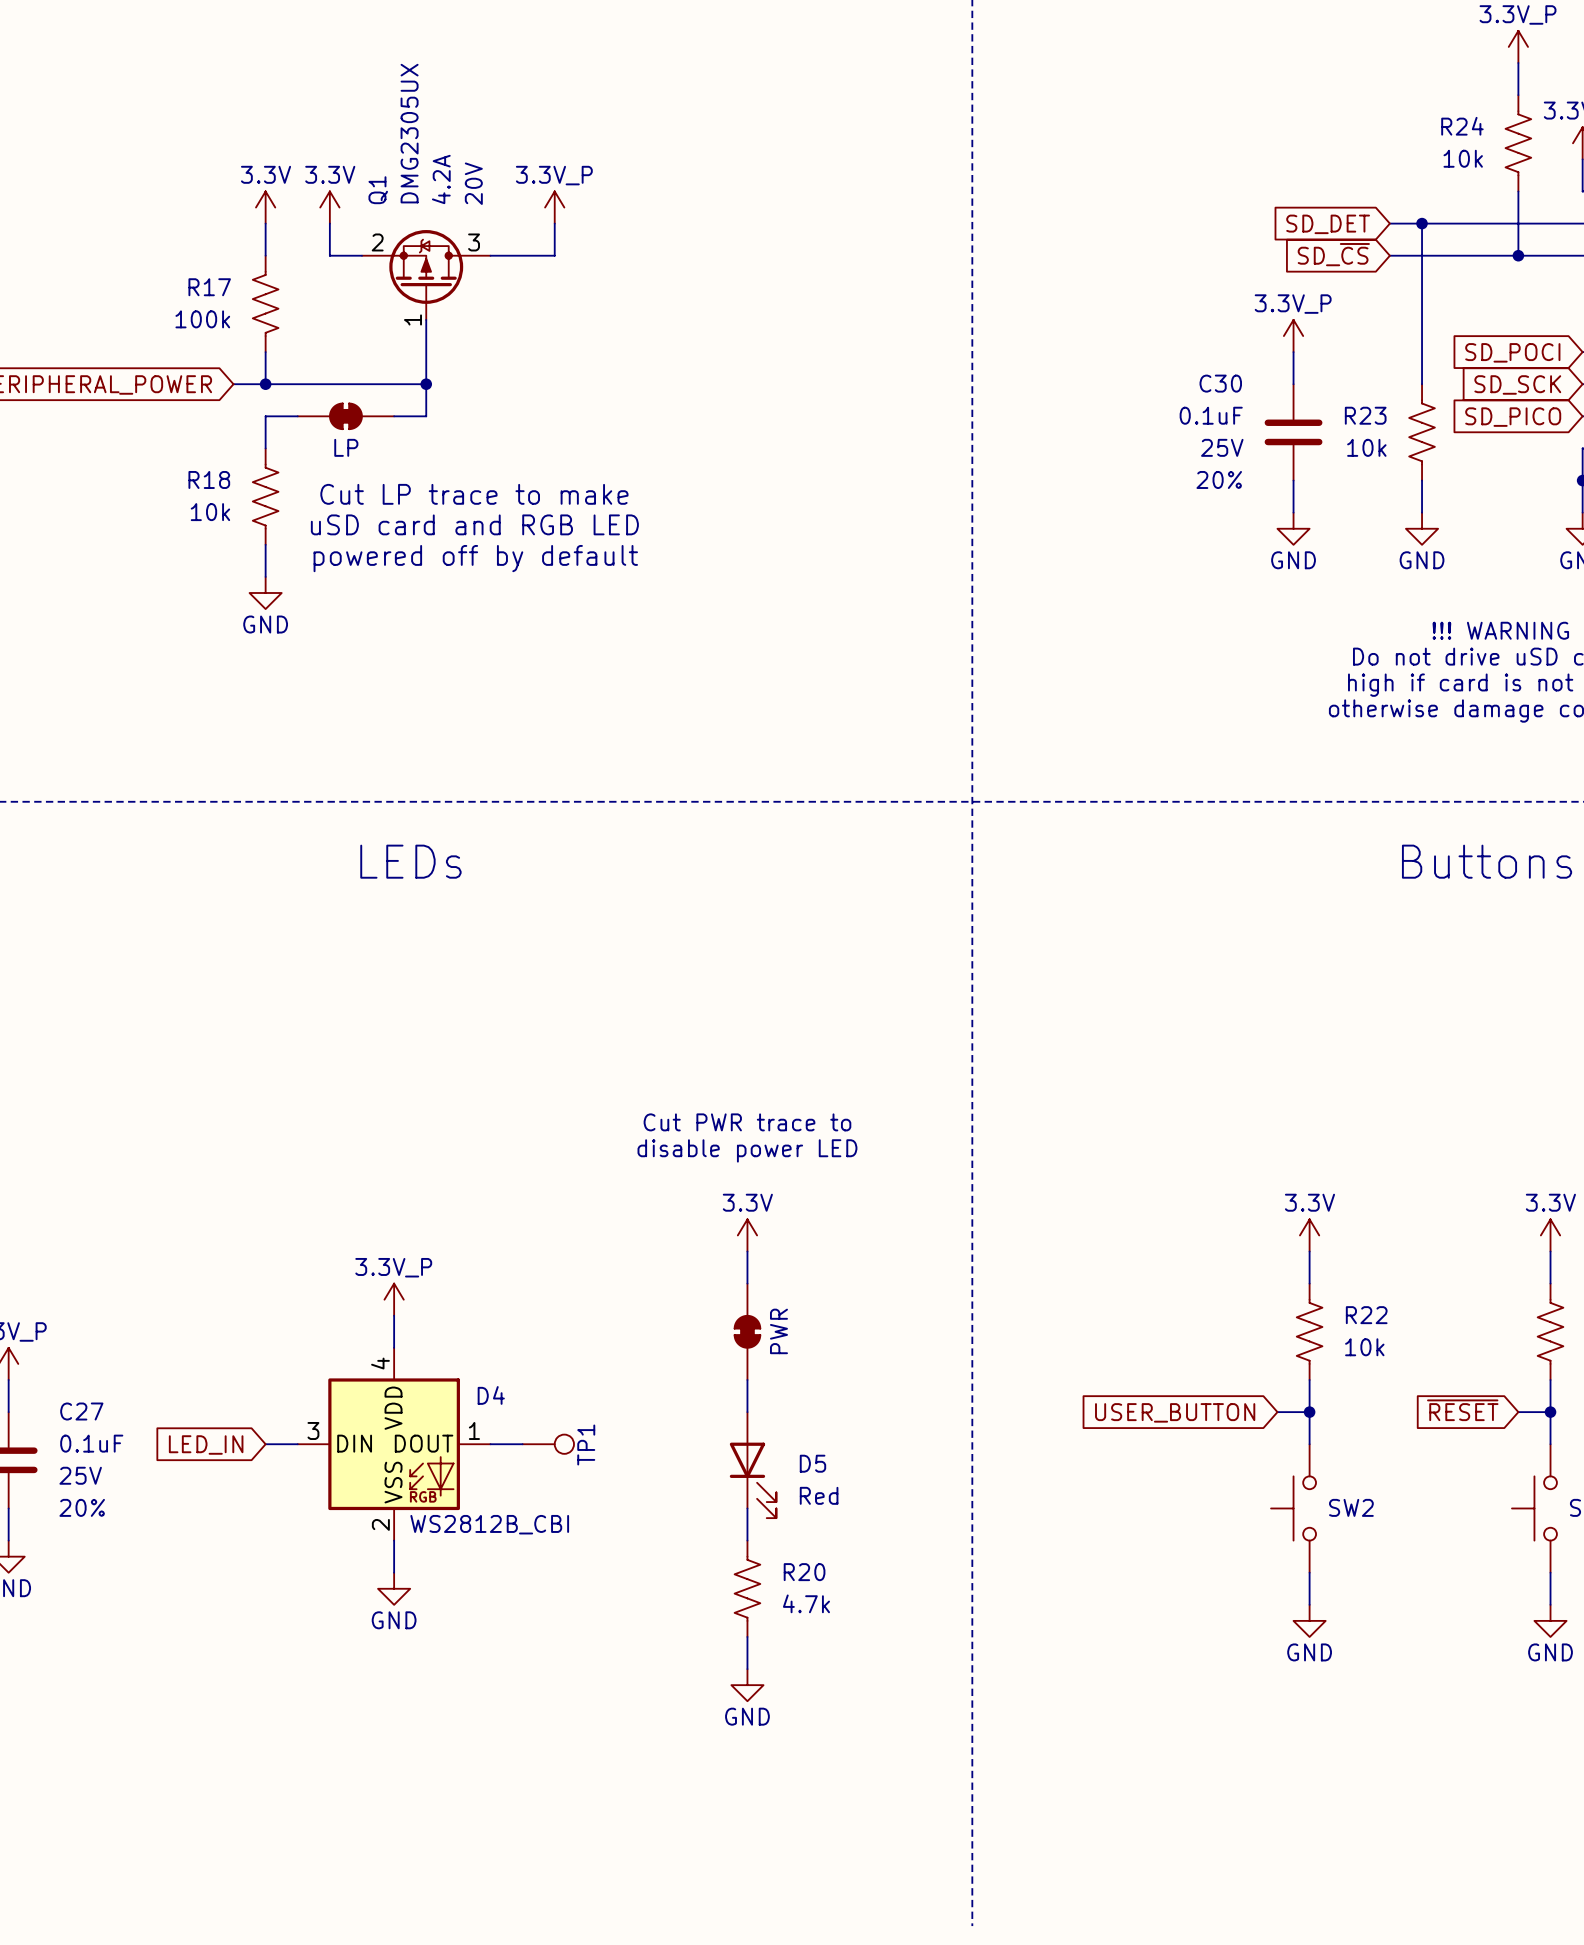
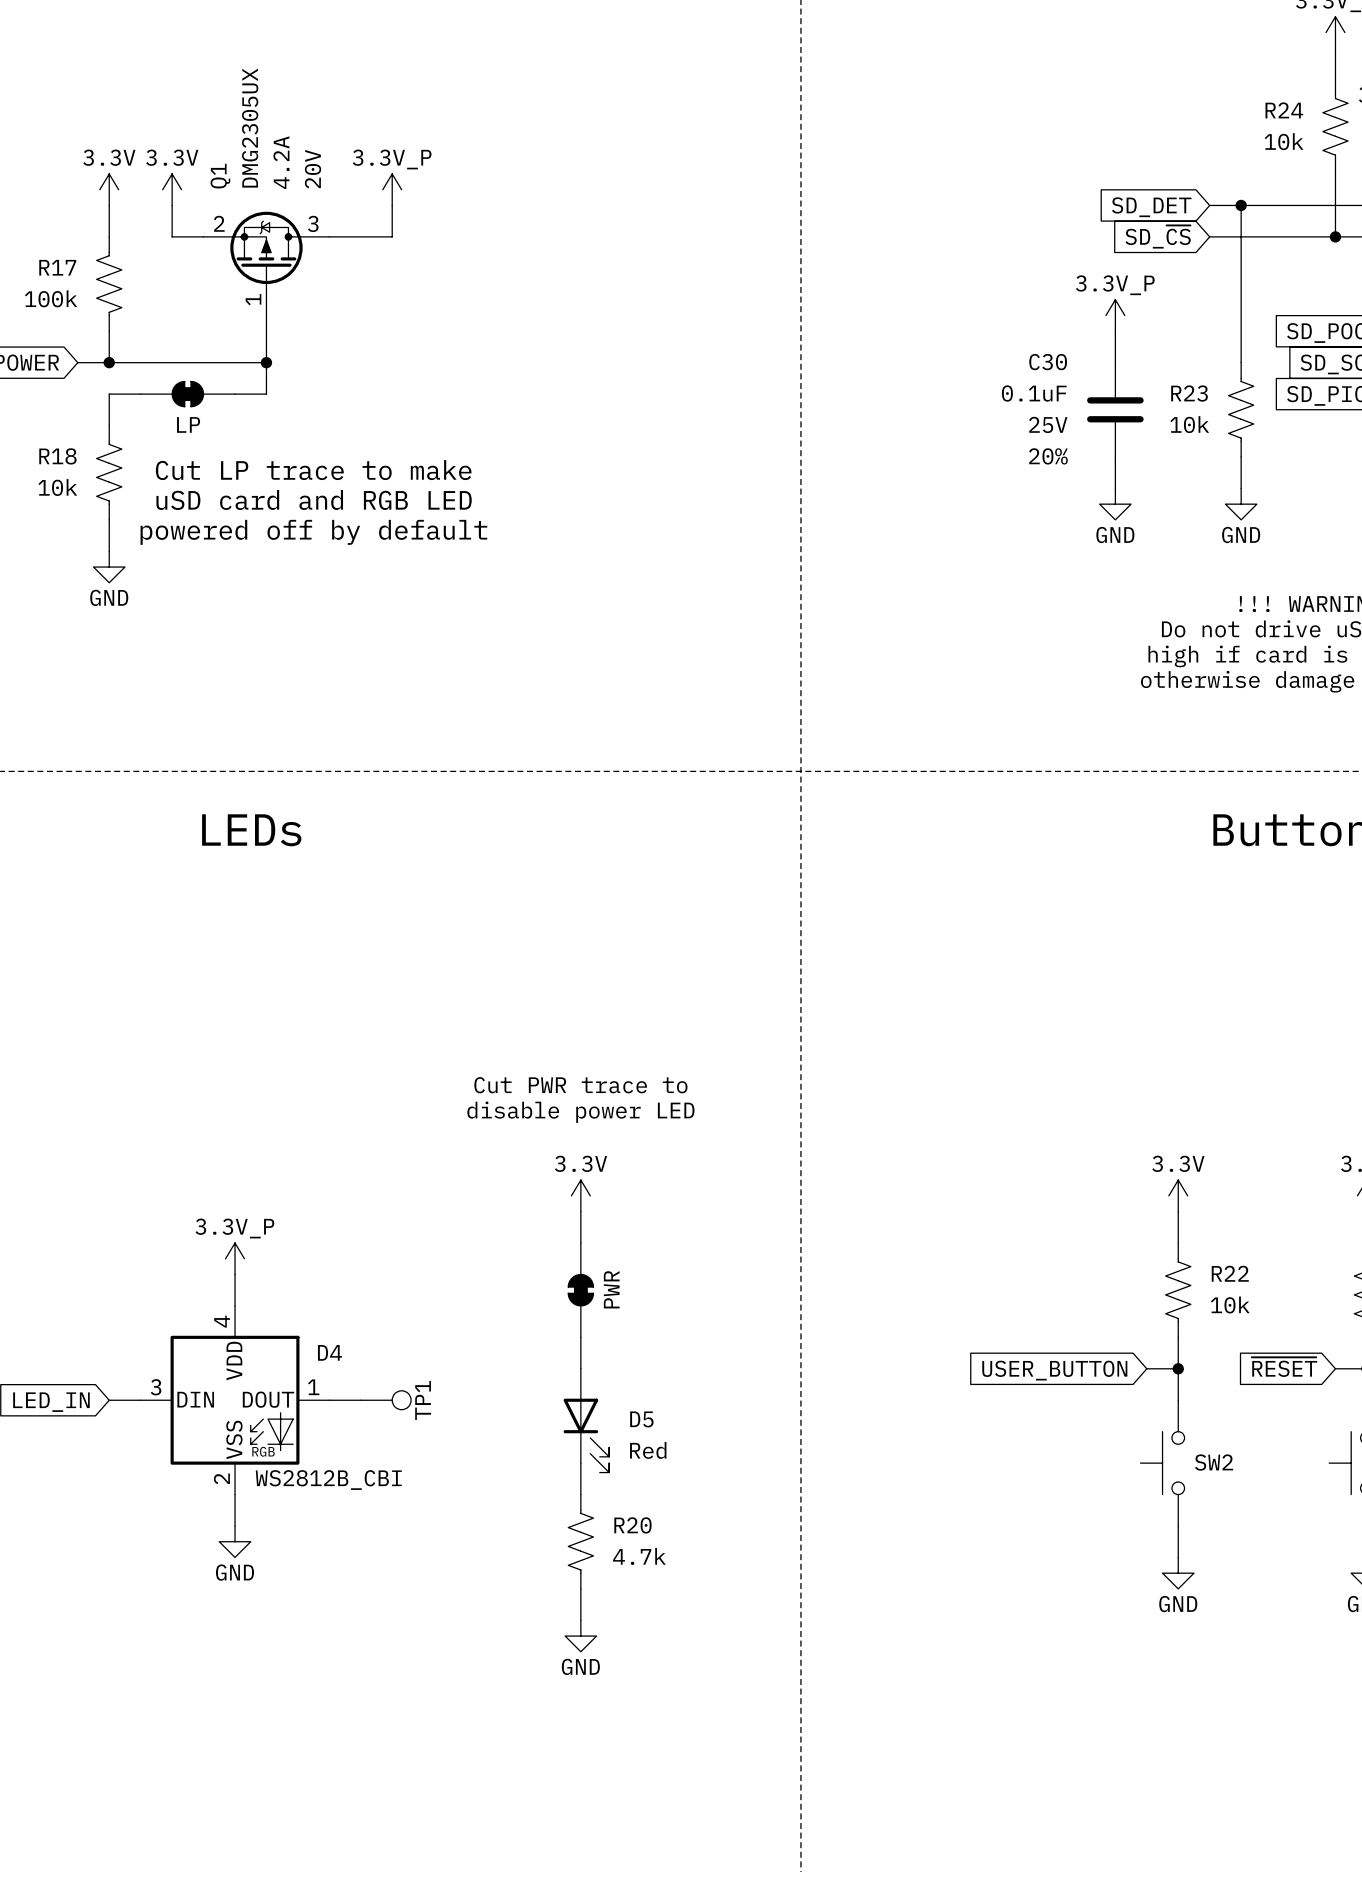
power symbol position: 3.3V (1309, 1235) -> 3.3V (1178, 1195)
wire: (1309, 1251) (1309, 1283) -> (1178, 1211) (1178, 1243)
R22 position: (1309, 1331) -> (1178, 1290)
wire: (1309, 1379) (1309, 1444) -> (1178, 1337) (1178, 1400)
global label position: USER_BUTTON (1175, 1412) -> USER_BUTTON (1054, 1370)
wire: (1277, 1412) (1309, 1412) -> (1146, 1368) (1178, 1368)
junction position: (1309, 1412) -> (1178, 1368)
SW2 position: (1293, 1508) -> (1162, 1463)
wire: (1309, 1572) (1309, 1604) -> (1178, 1526) (1178, 1557)
power symbol position: GND (1309, 1620) -> GND (1178, 1573)

